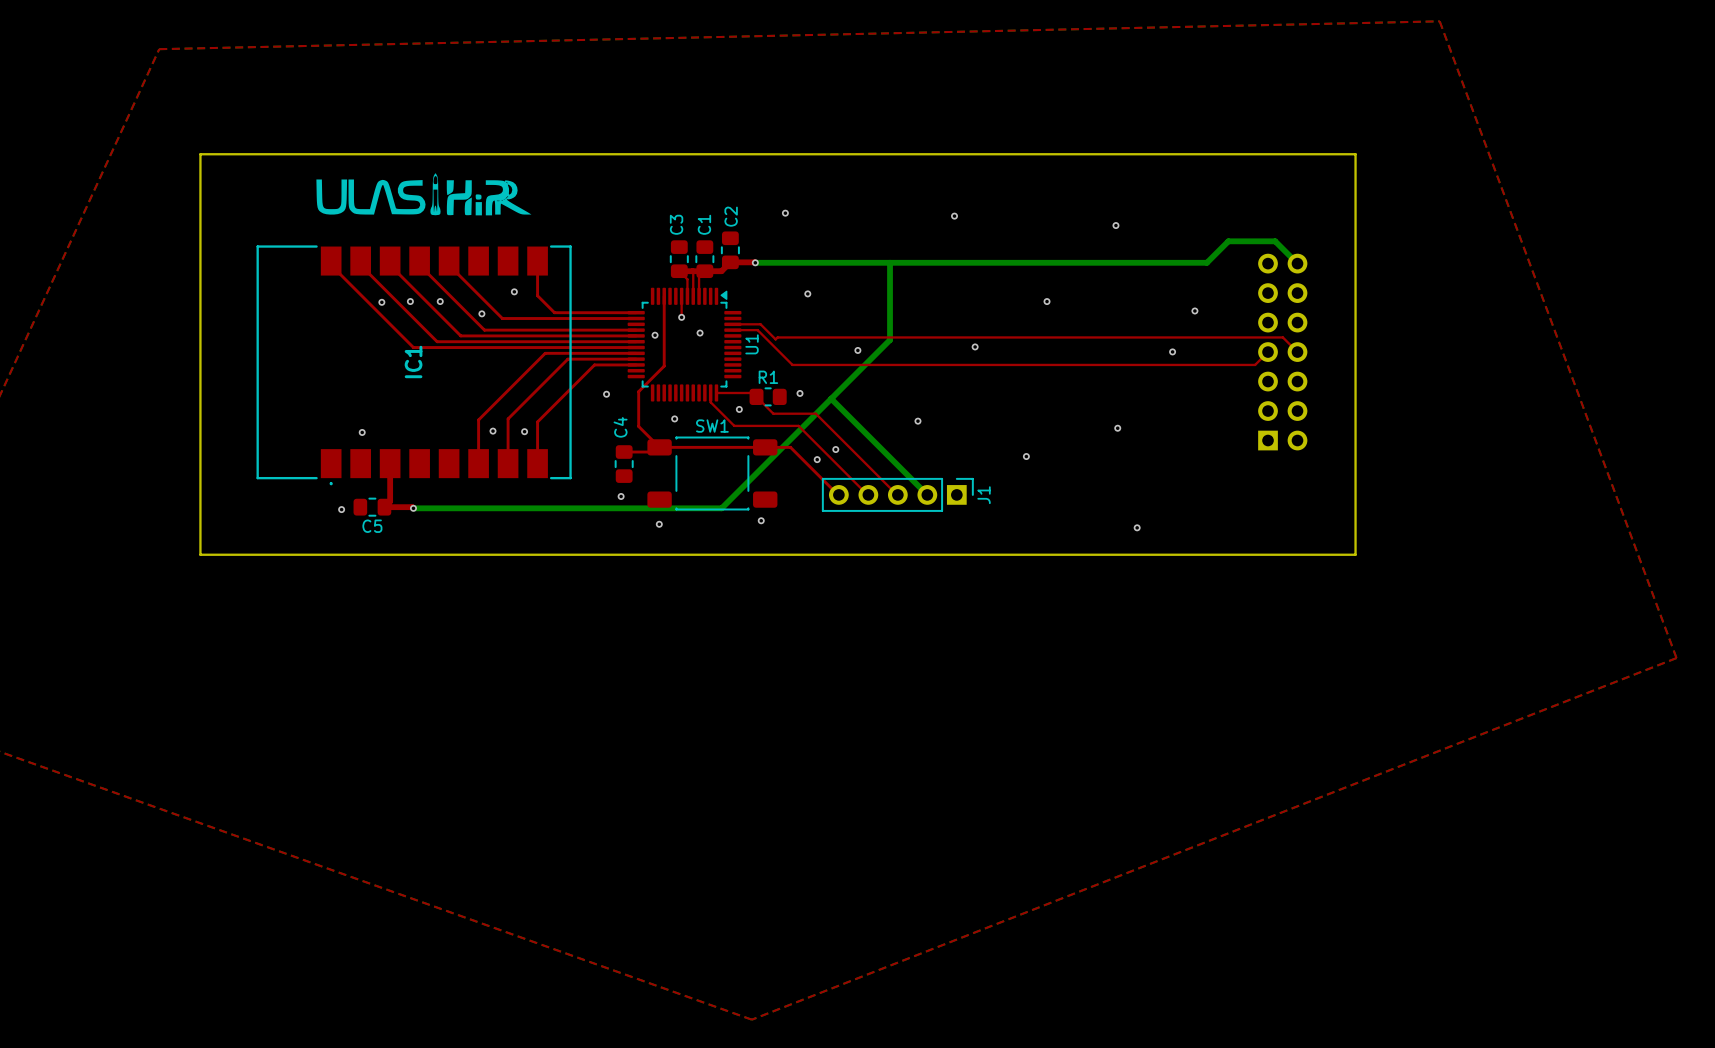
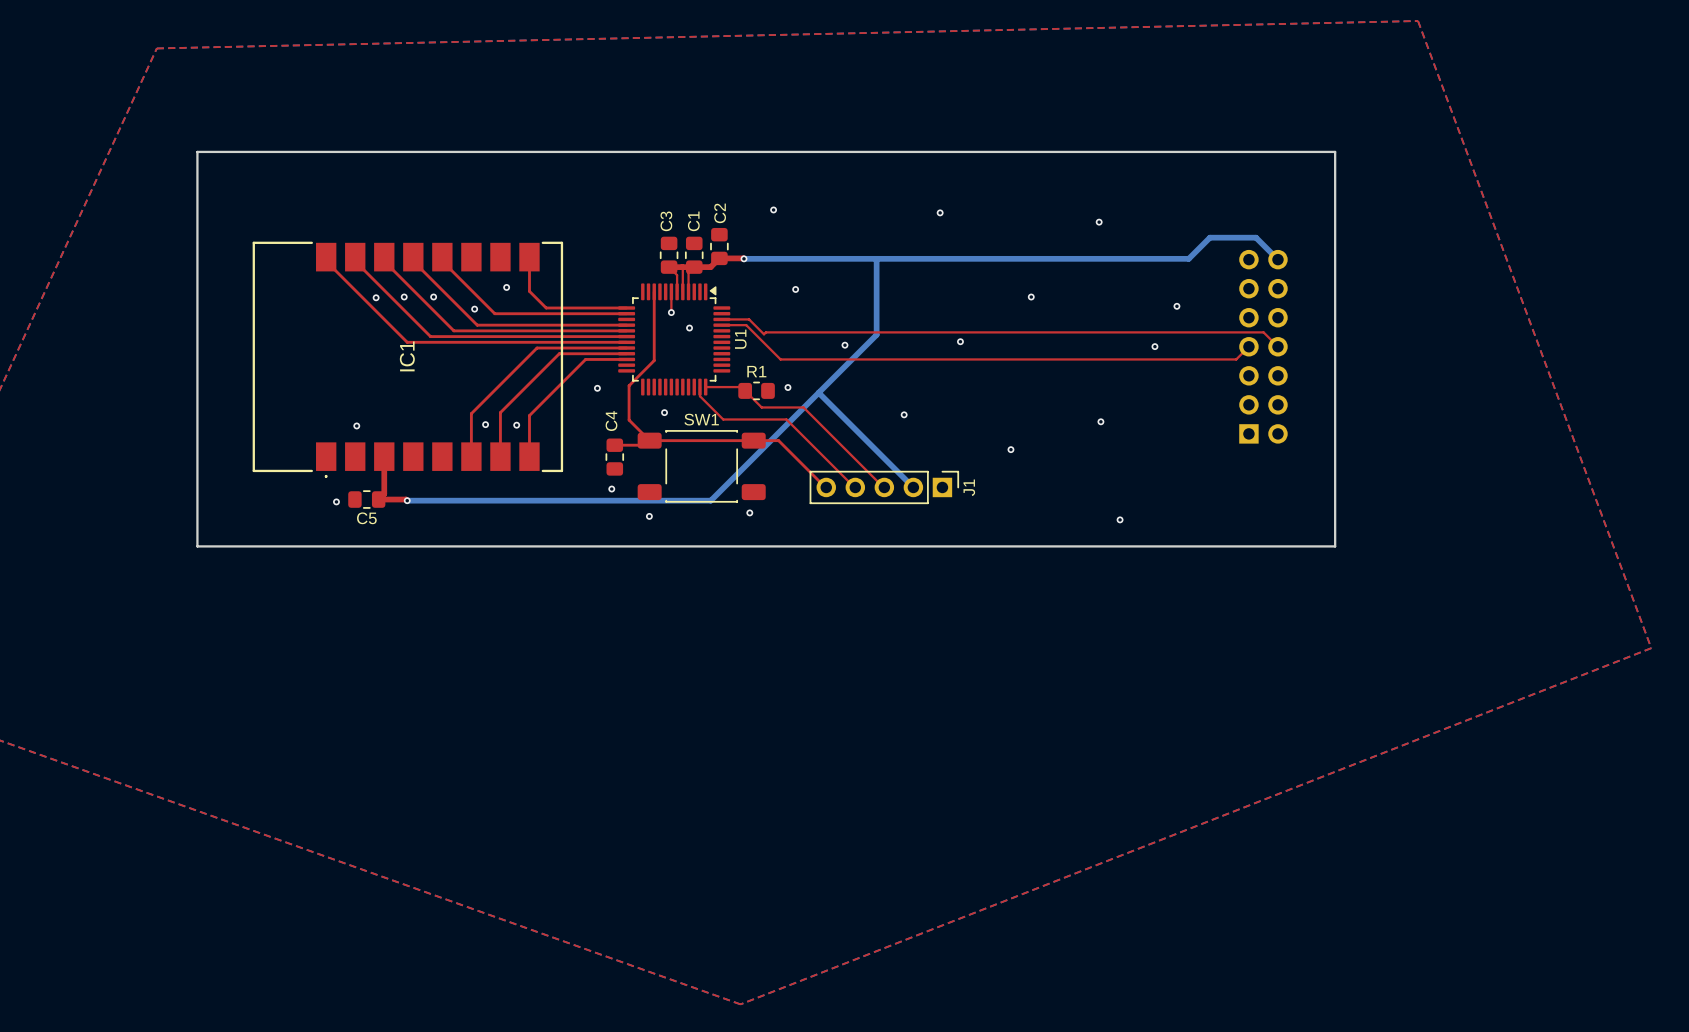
drawing: [316, 173, 532, 216] -> none
via: (655, 335) -> none
via: (739, 409) -> none
via: (835, 449) -> none
via: (817, 459) -> none

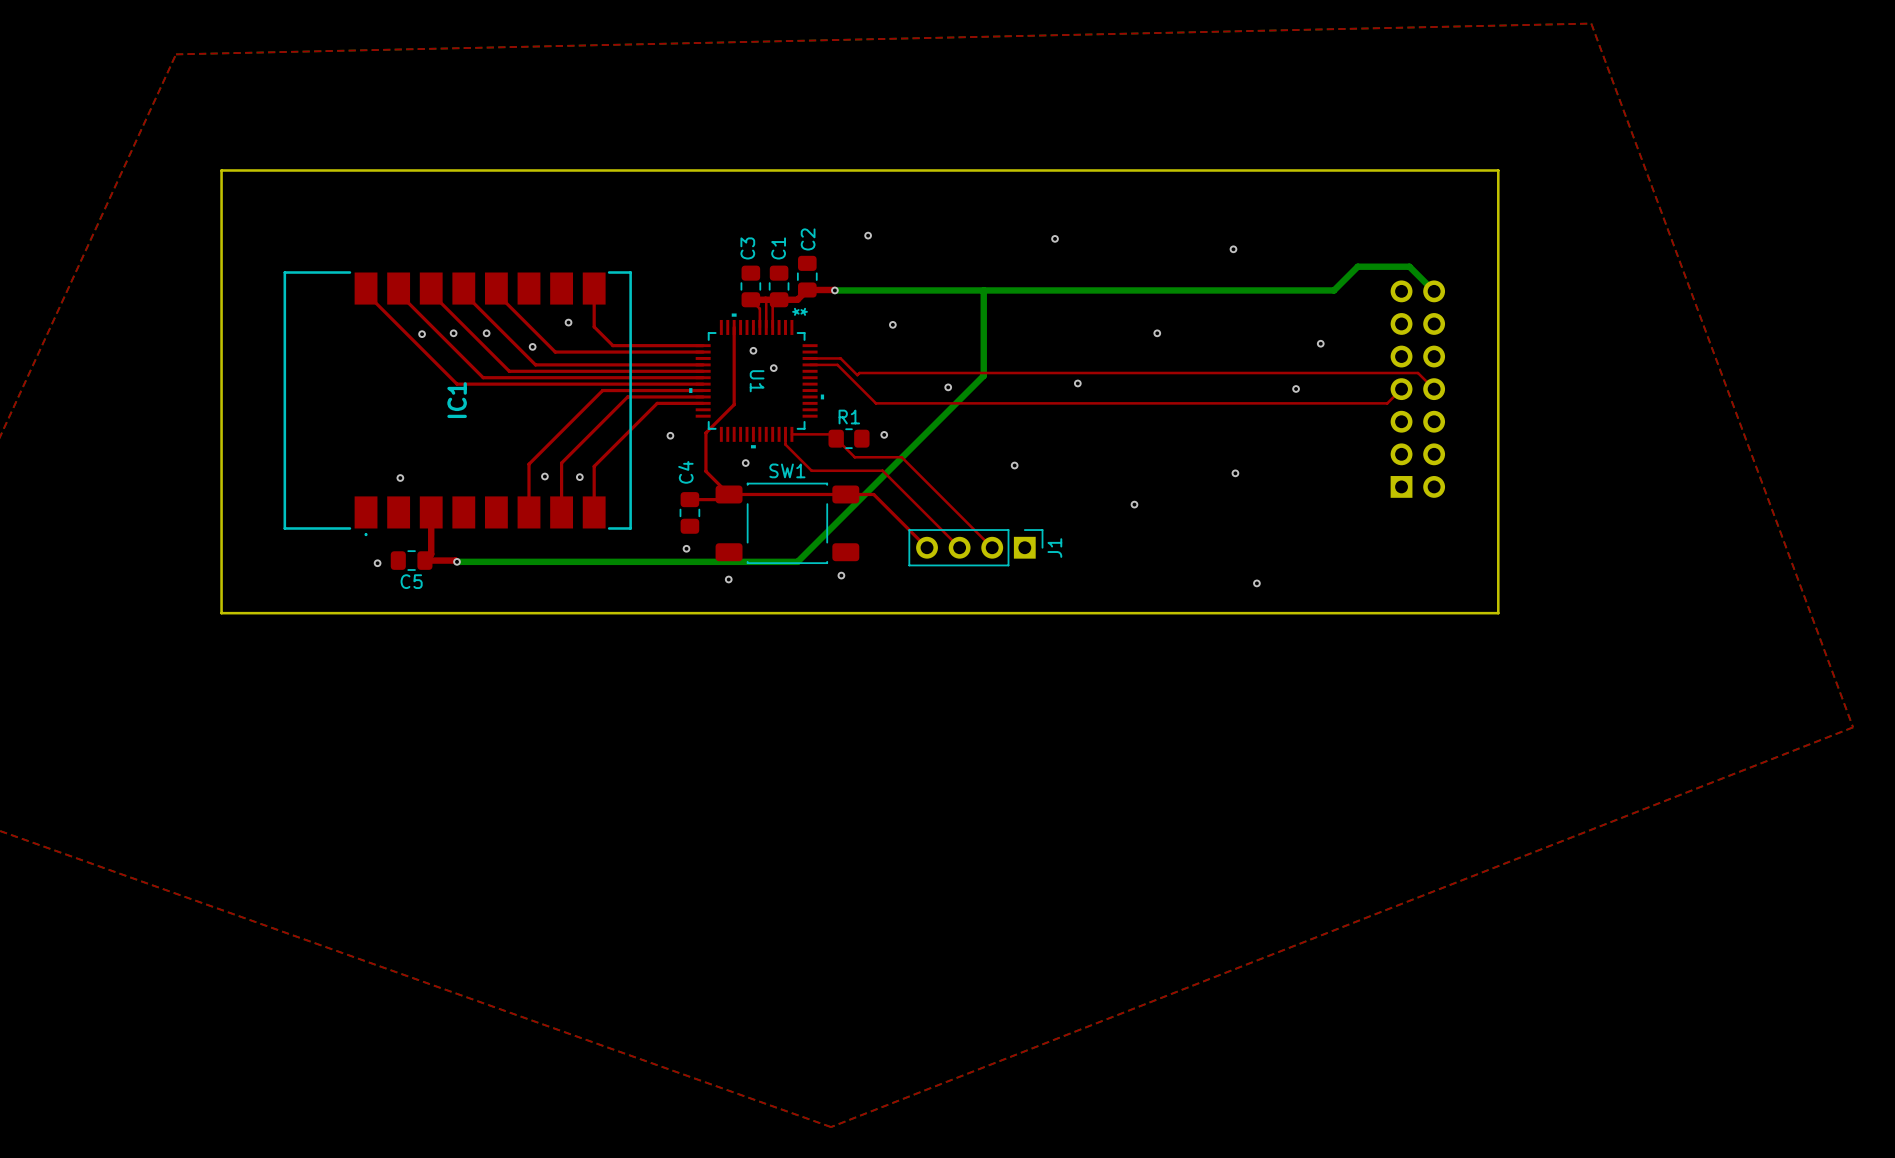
U1 footprint: [618, 283, 731, 396] -> [689, 313, 825, 449]
top track: (671, 291) (671, 312) -> none
U1 name position: U1 (740, 339) -> U1 (757, 381)
bottom track: (818, 392) (913, 487) -> none
J1 footprint: [809, 471, 959, 504] -> [908, 529, 1044, 567]

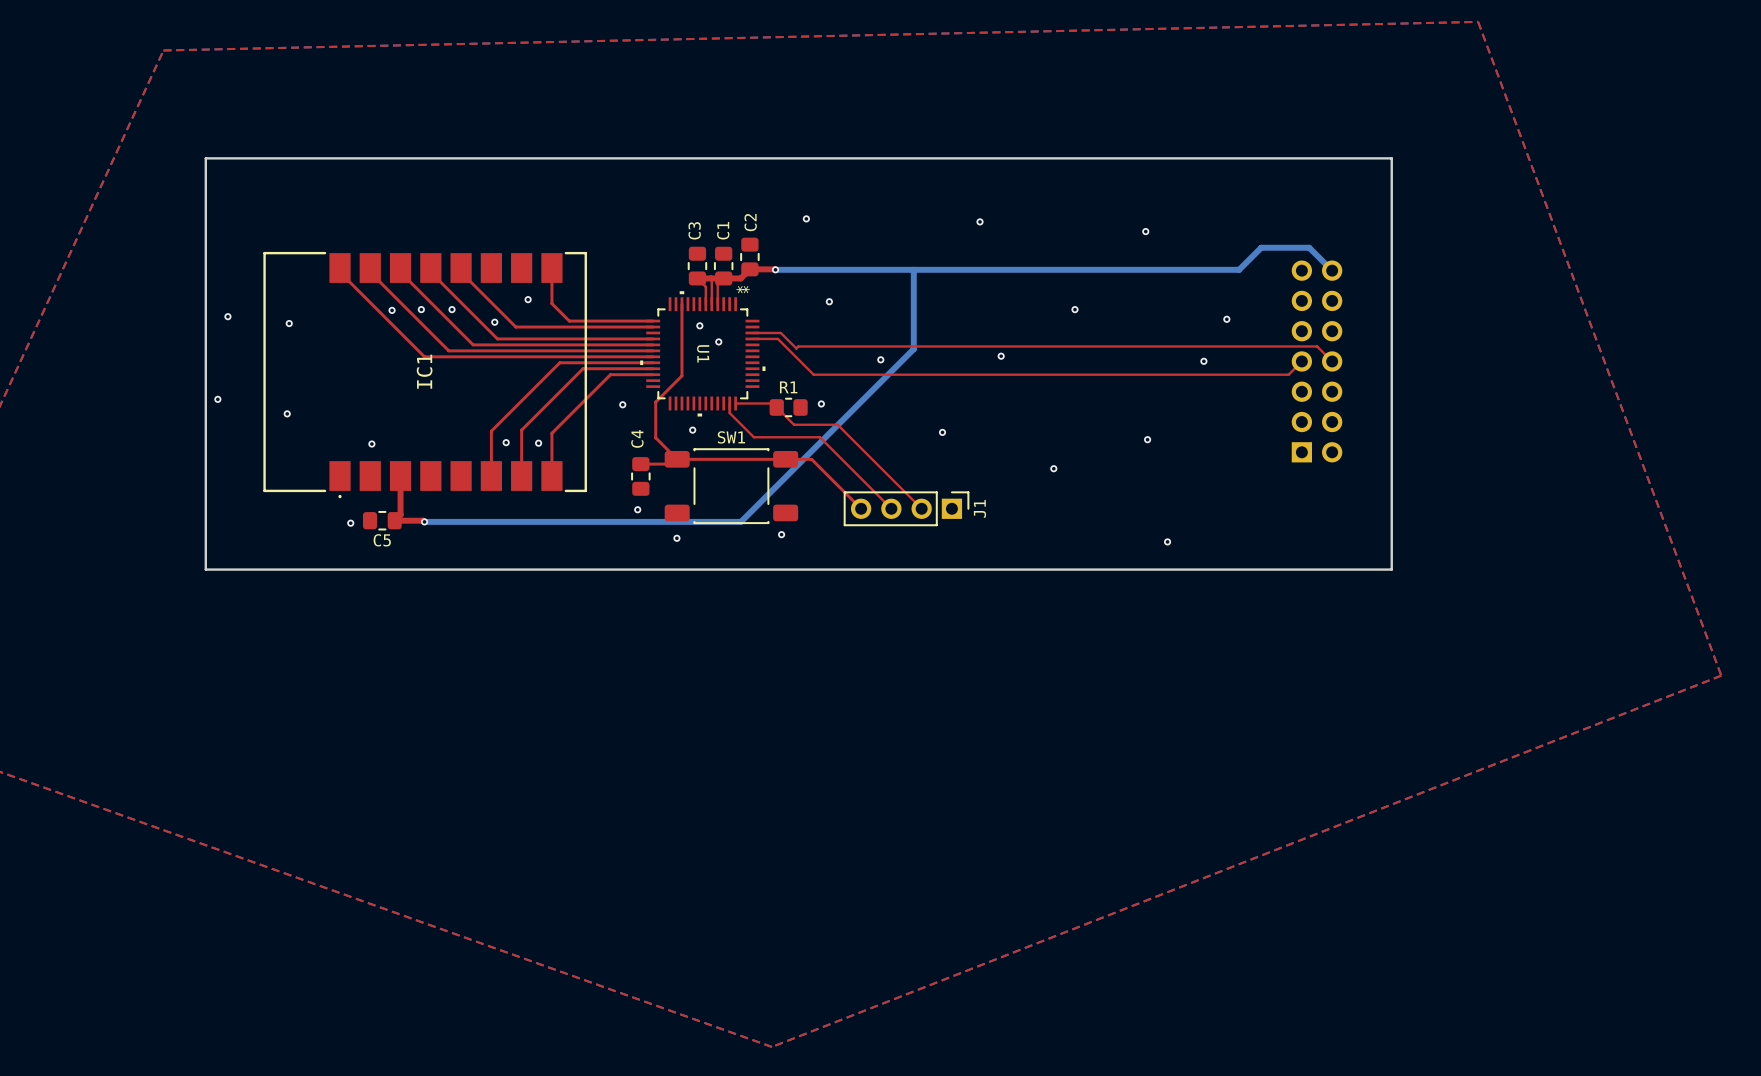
via: none -> (227, 316)
via: none -> (289, 323)
via: none -> (217, 399)
via: none -> (287, 413)

